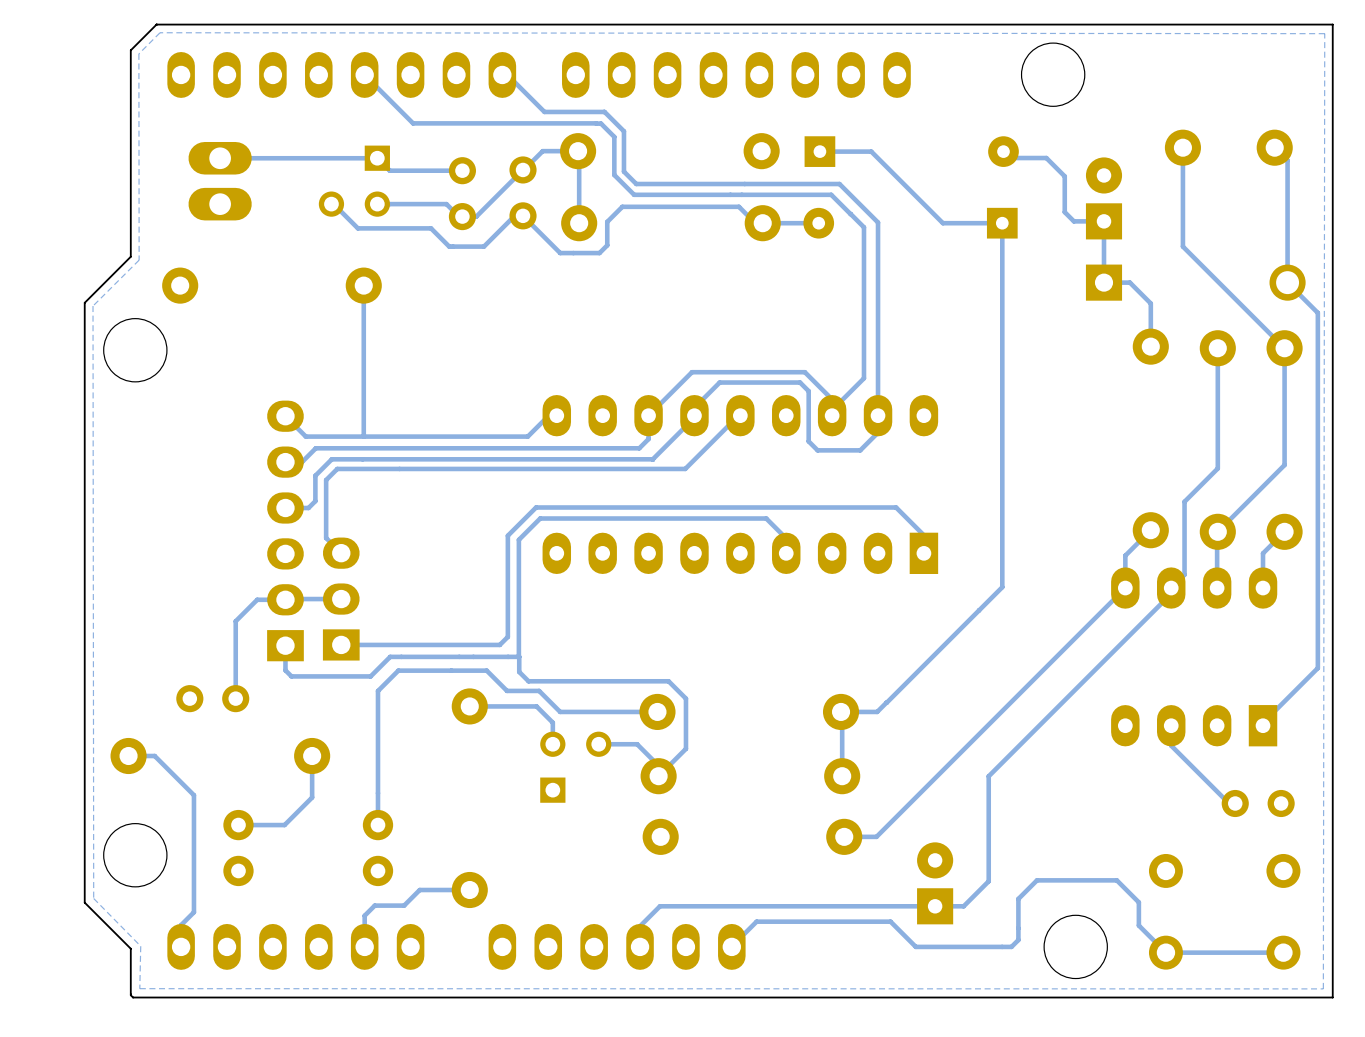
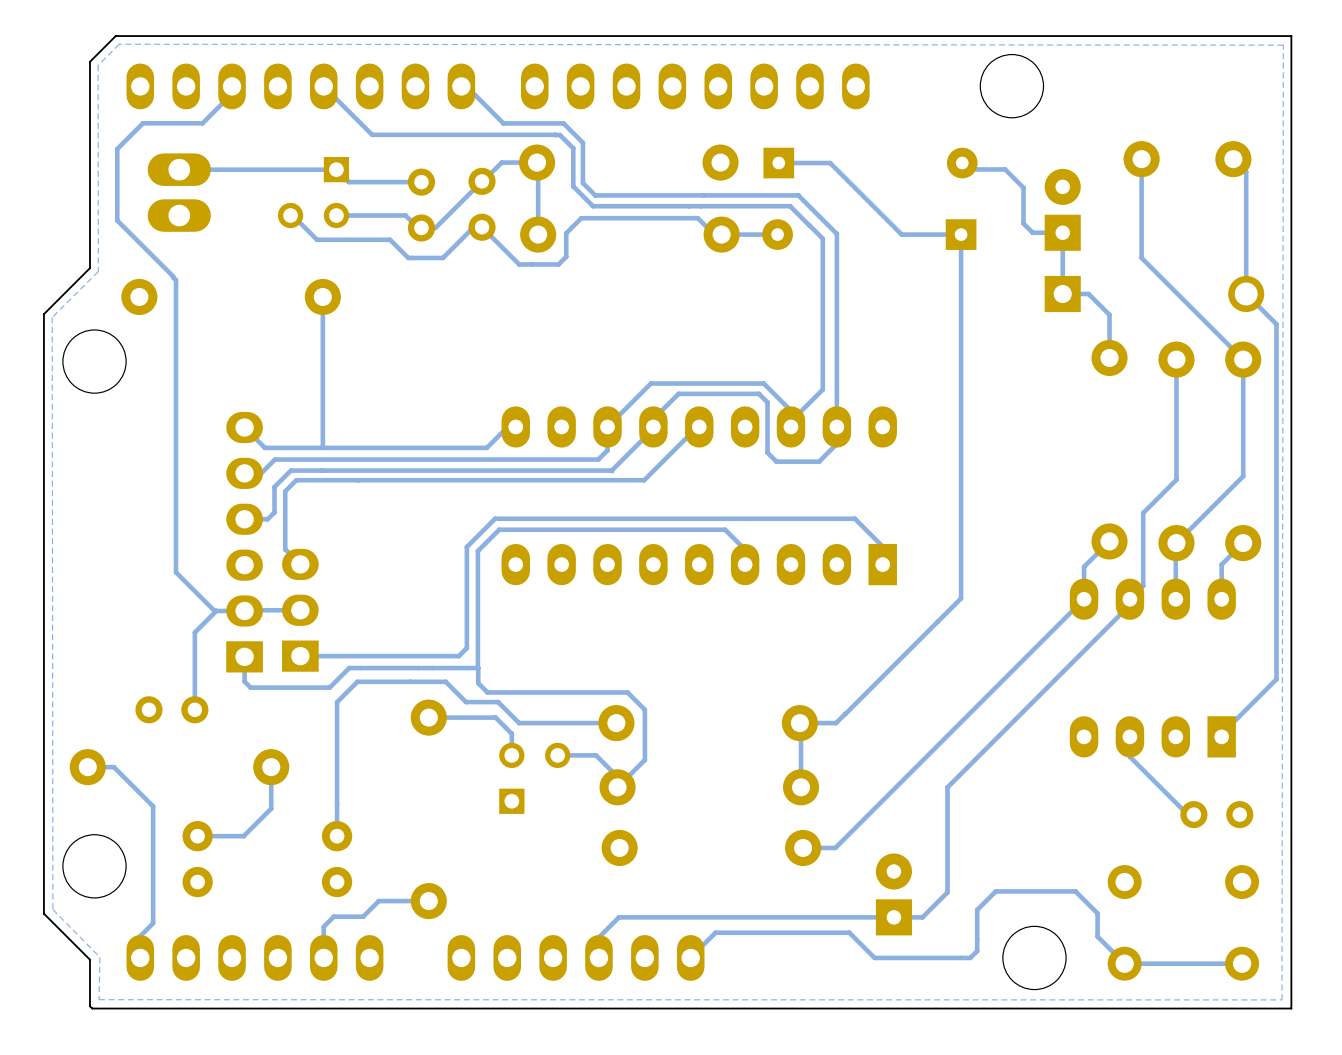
track: none -> (232, 86) (232, 93) (202, 123) (142, 123) (117, 149) (117, 220) (175, 280) (175, 572) (216, 611)

